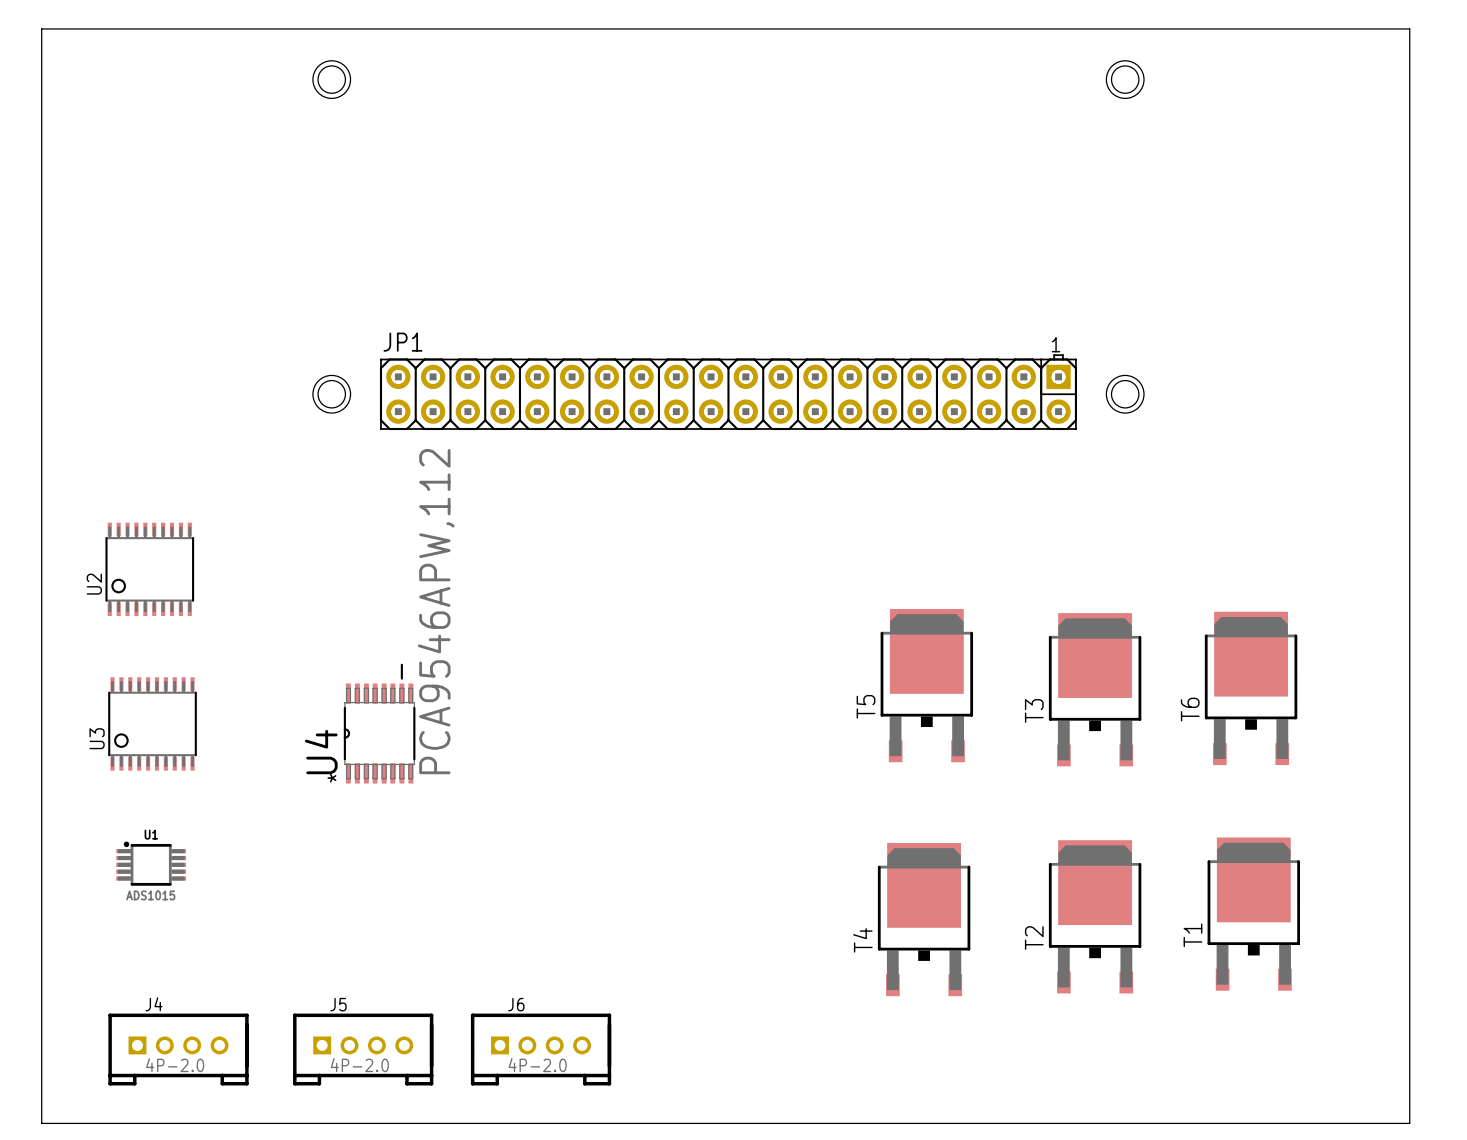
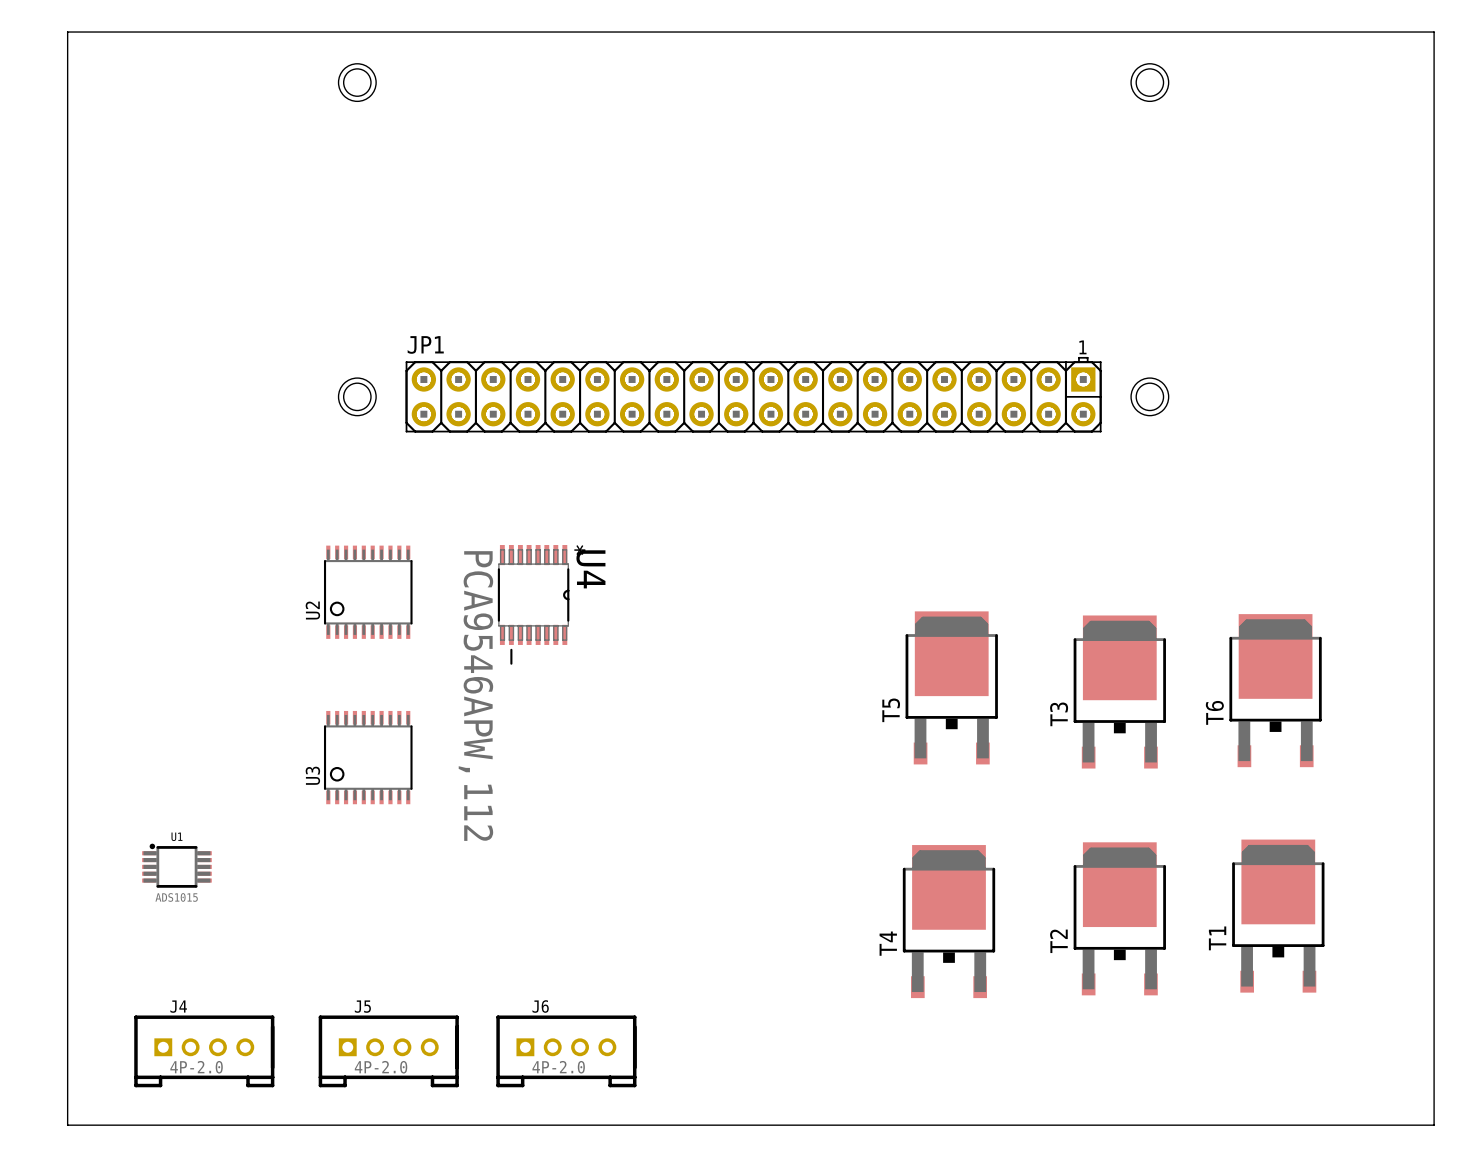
U2 position: (149, 569) -> (368, 592)
U3 position: (152, 723) -> (368, 757)
U4 rotation: 0° (379, 723) -> 180° (533, 604)
U4 position: (379, 723) -> (533, 604)

